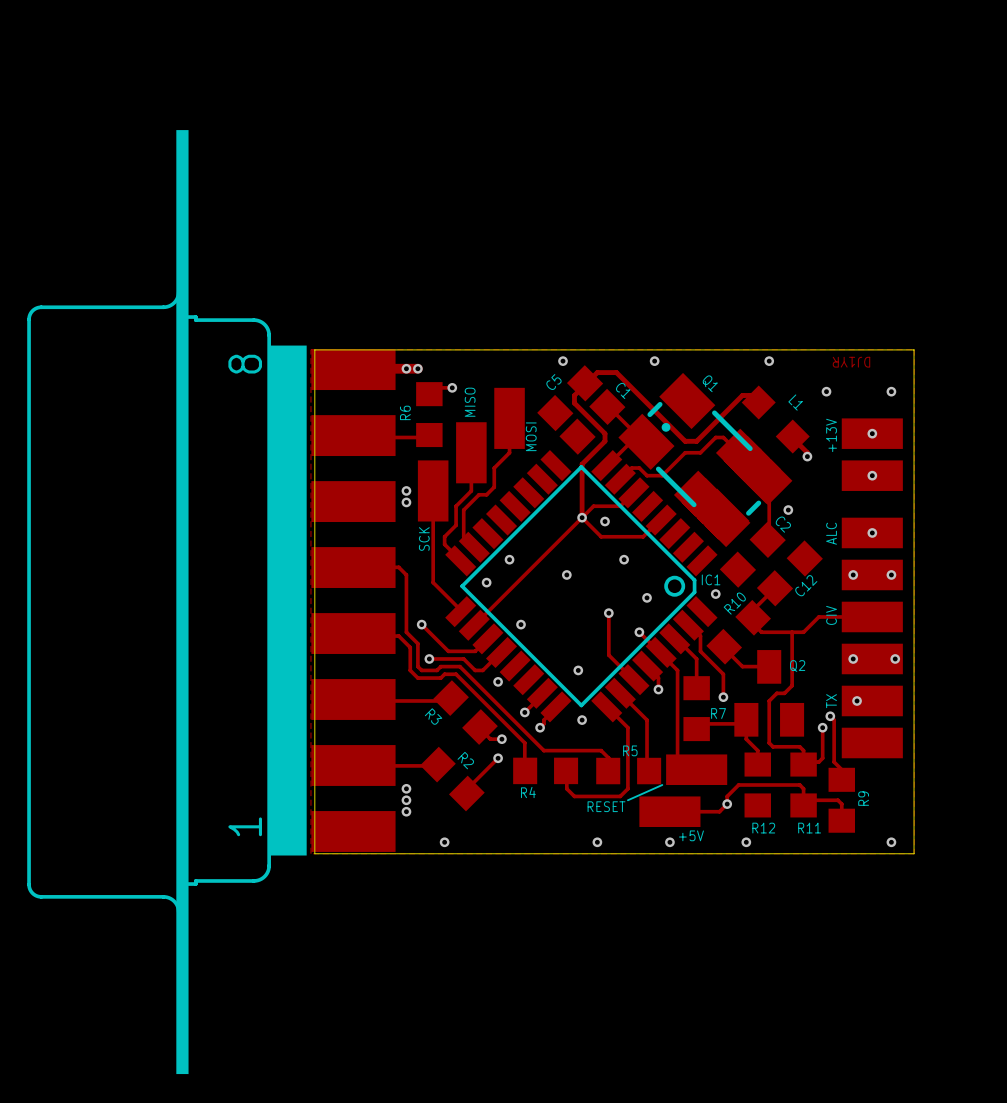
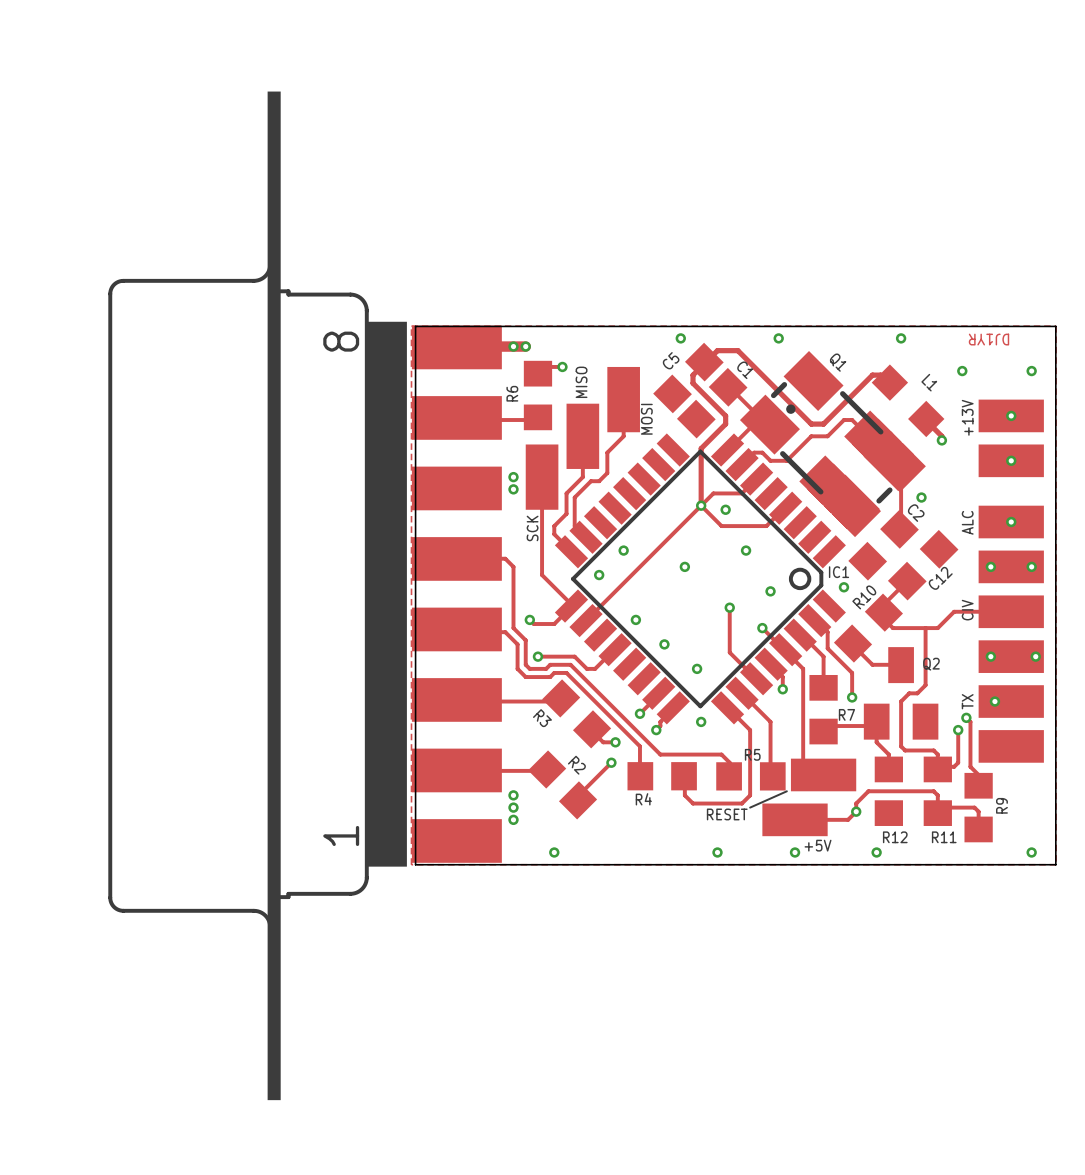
track: (425, 628) (448, 651) (475, 651) (486, 639) -> (533, 624) (554, 624) (570, 607)
via position: (498, 681) -> (664, 644)

